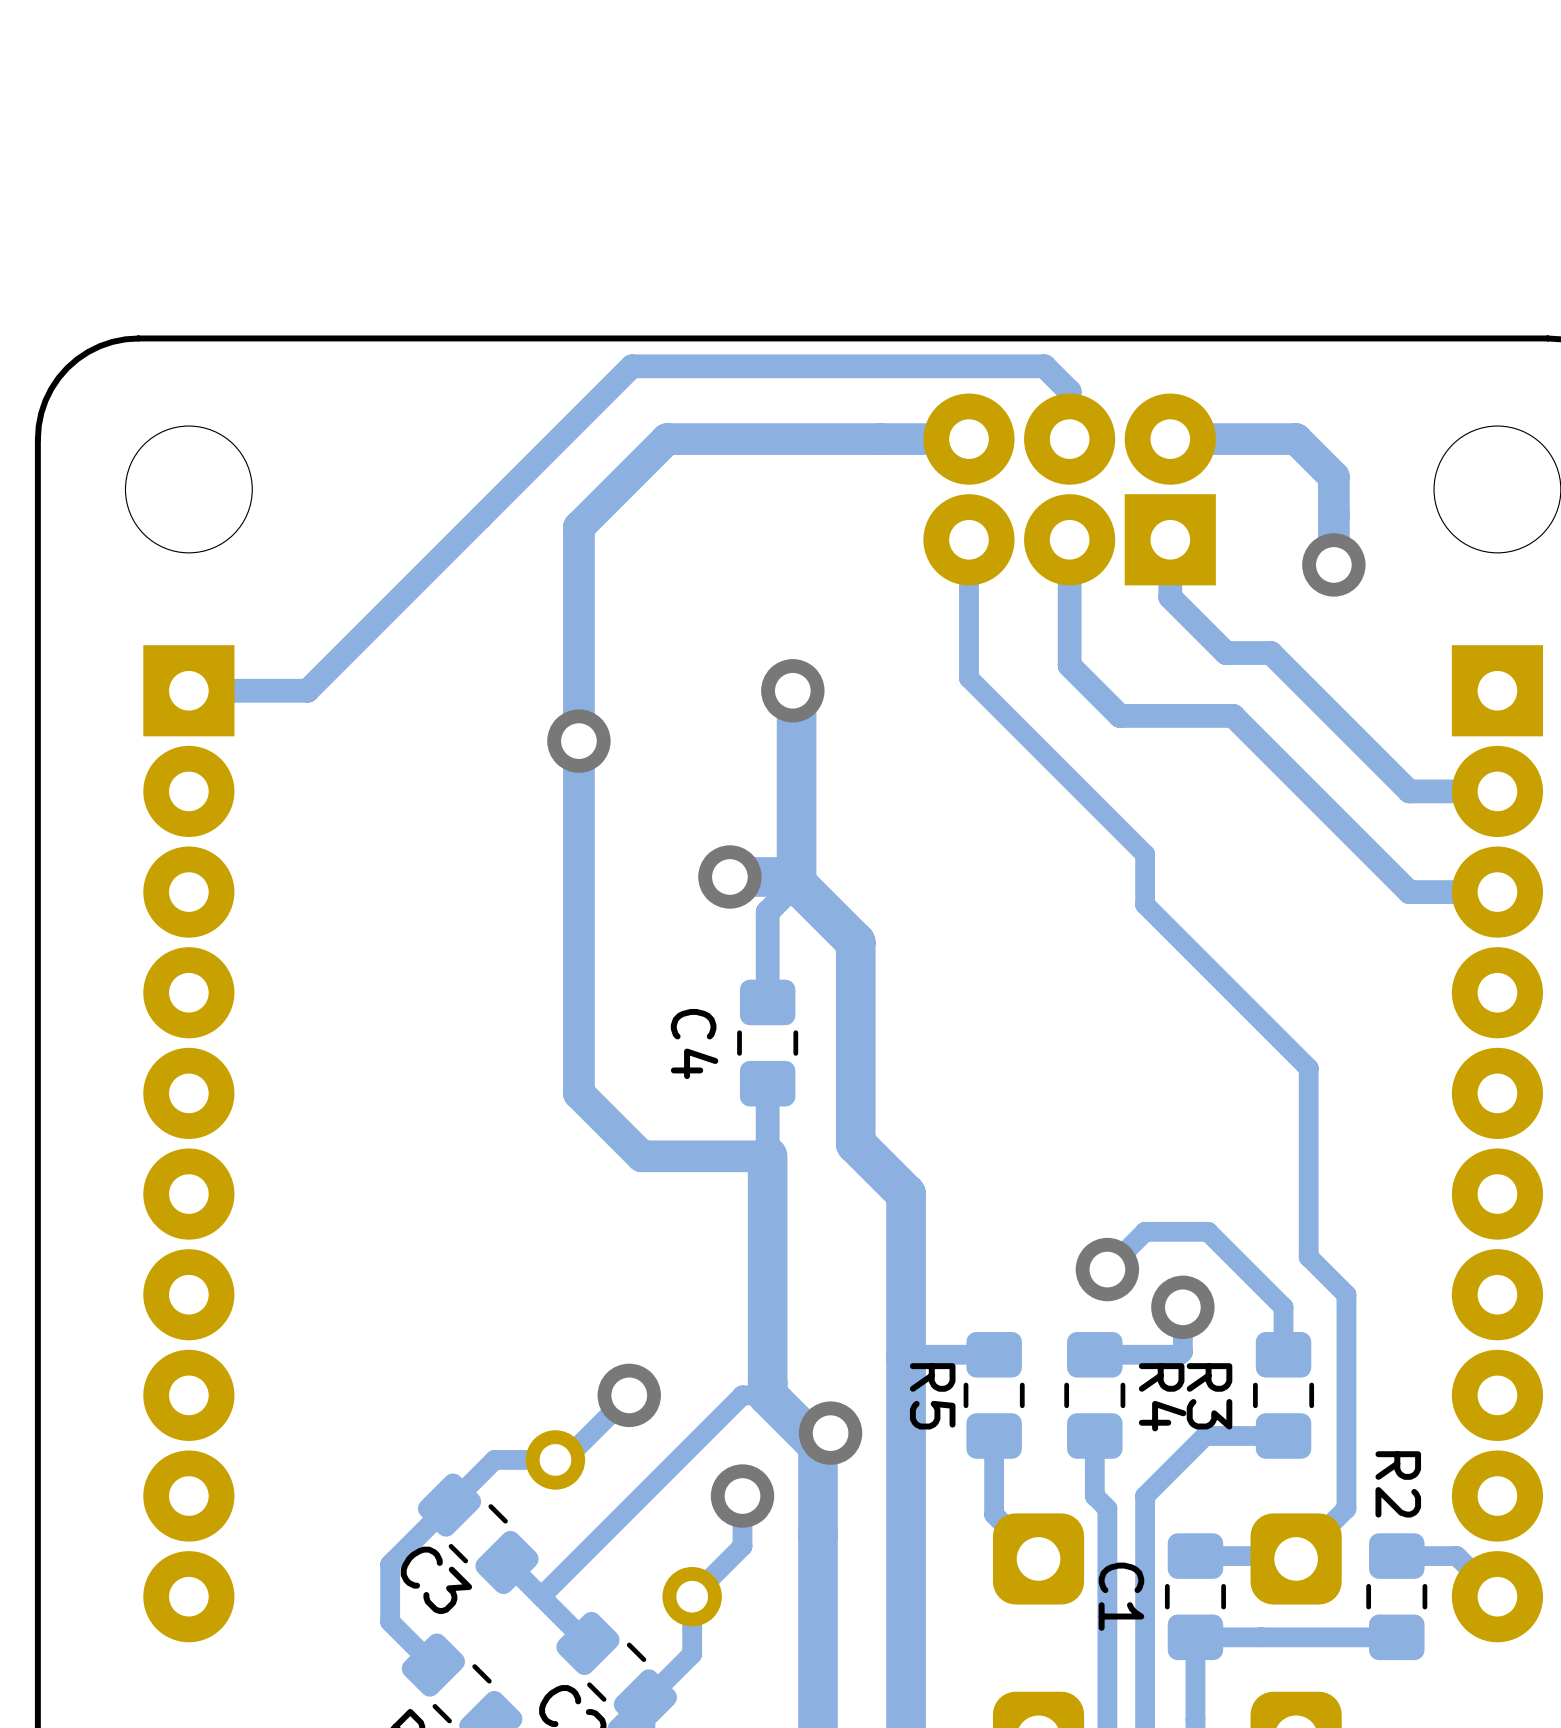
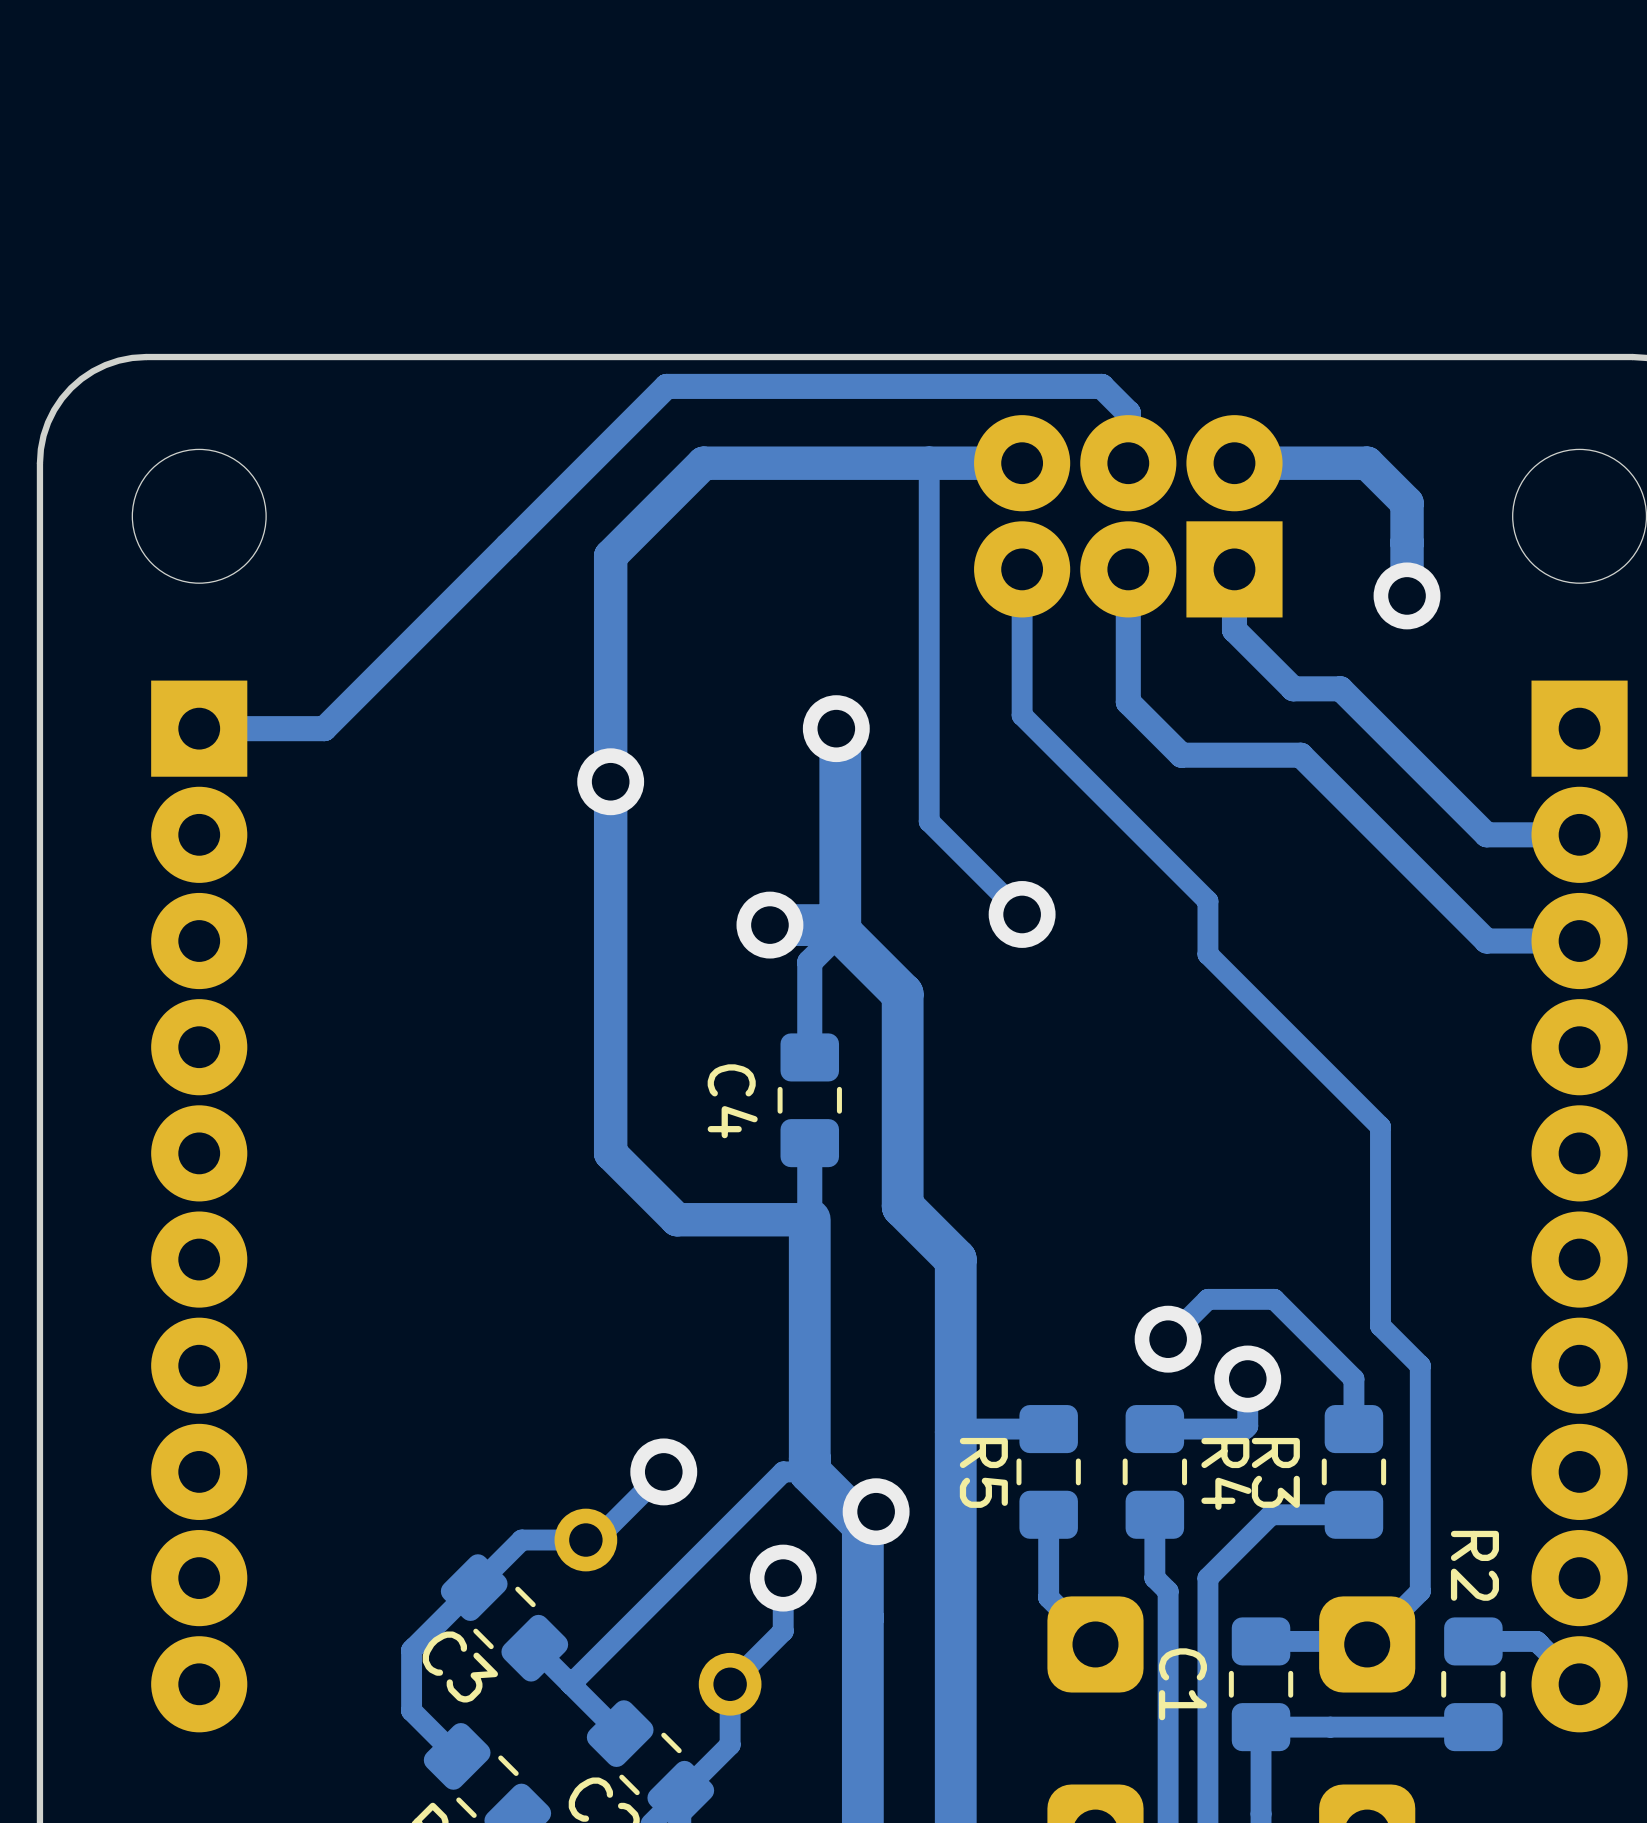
track: none -> (929, 463) (929, 821) (1022, 914)
via: none -> (1022, 914)

